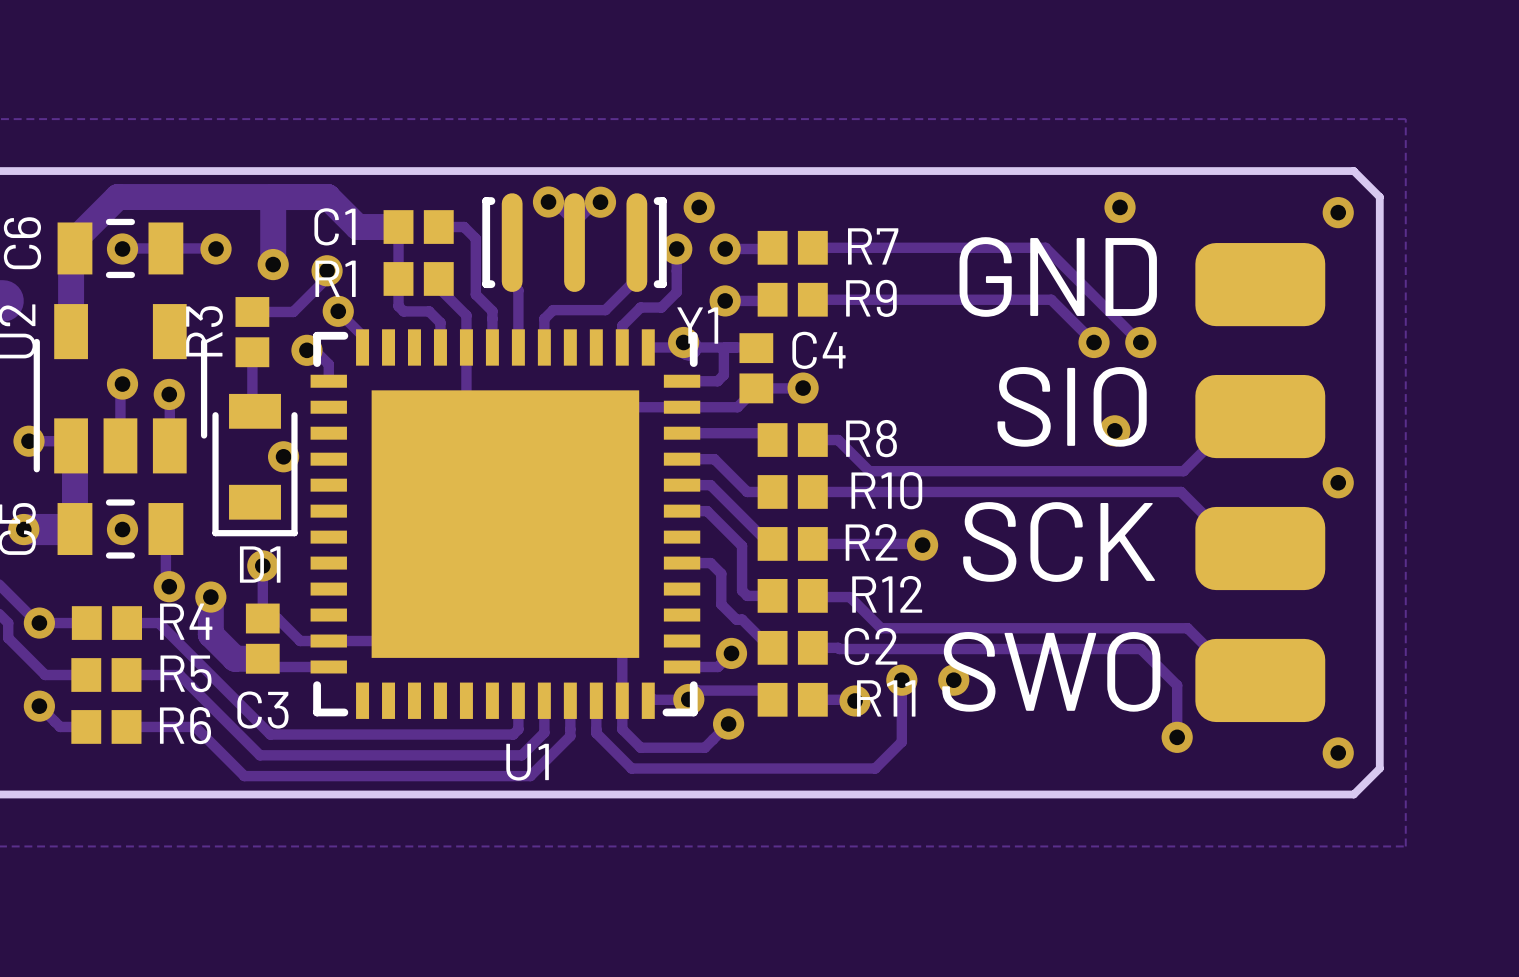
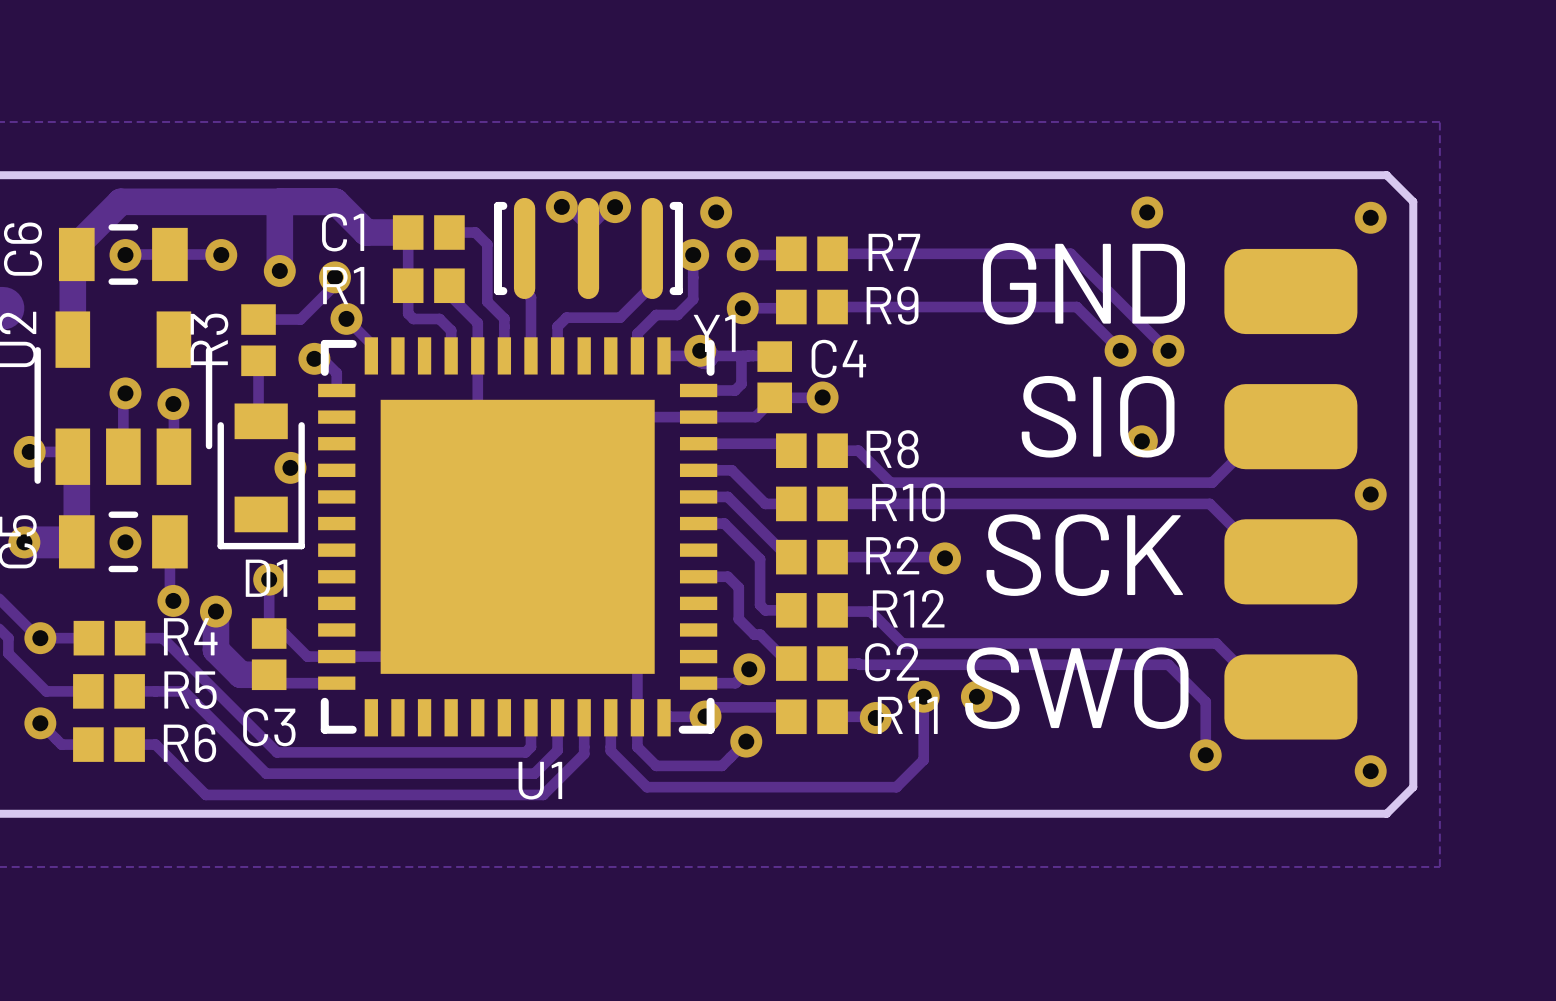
track: (151, 726) (195, 726) (244, 776) -> (155, 744) (205, 794) (250, 794)

